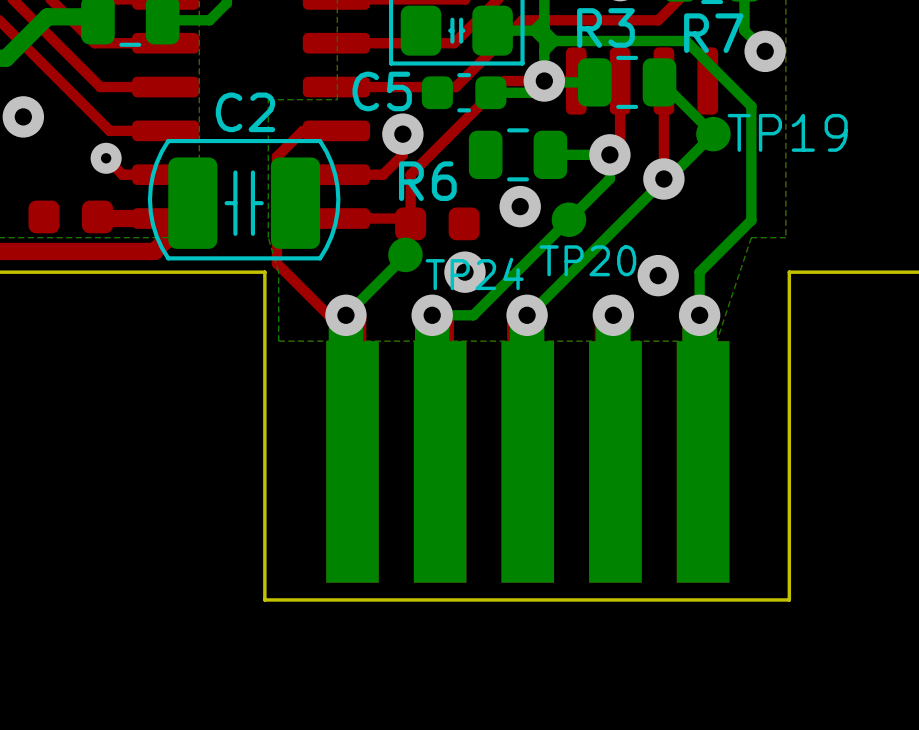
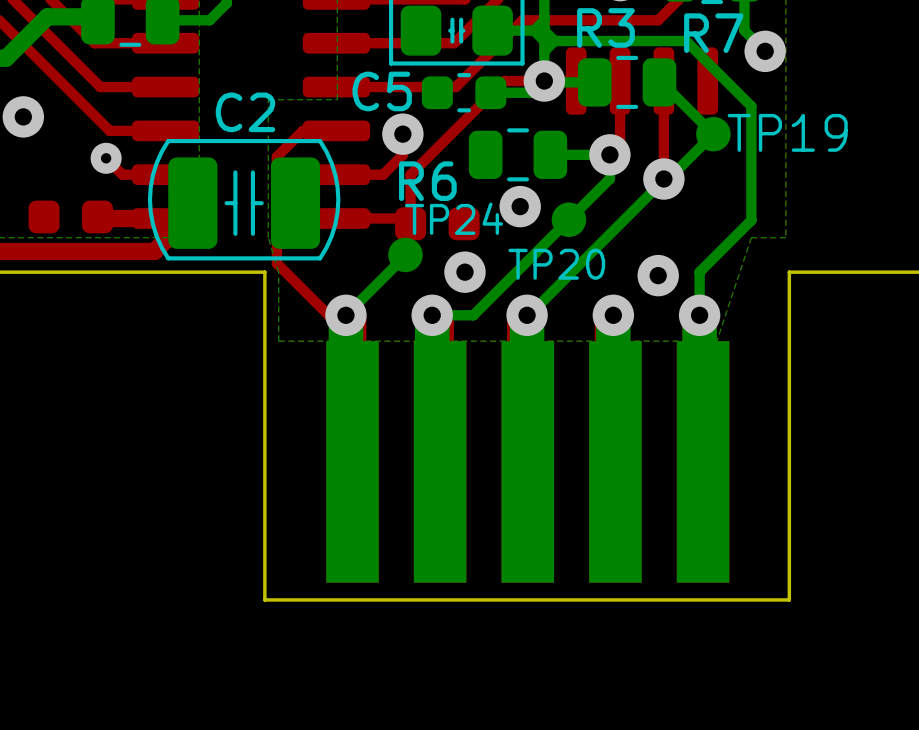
TP20 name position: TP20 (587, 260) -> TP20 (556, 264)
TP24 name position: TP24 (474, 273) -> TP24 (453, 218)

